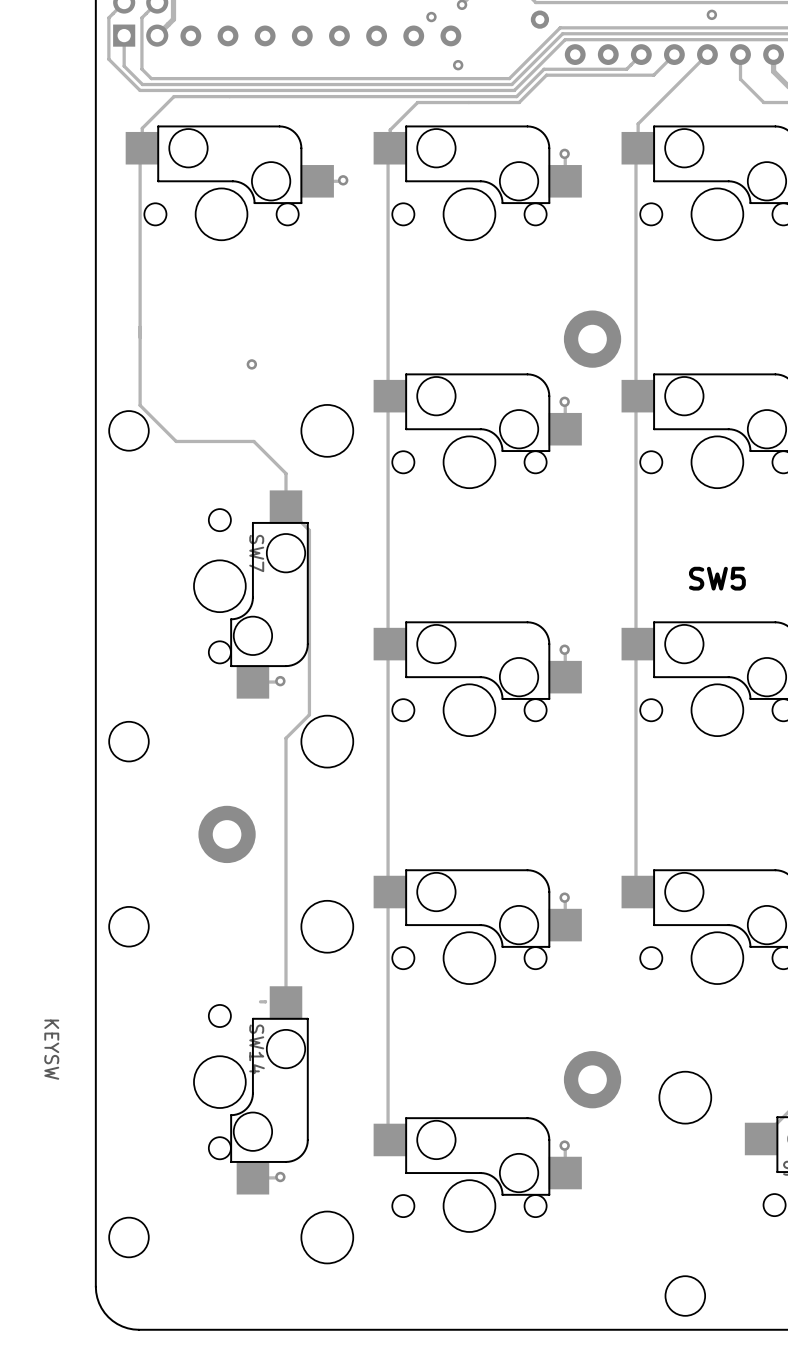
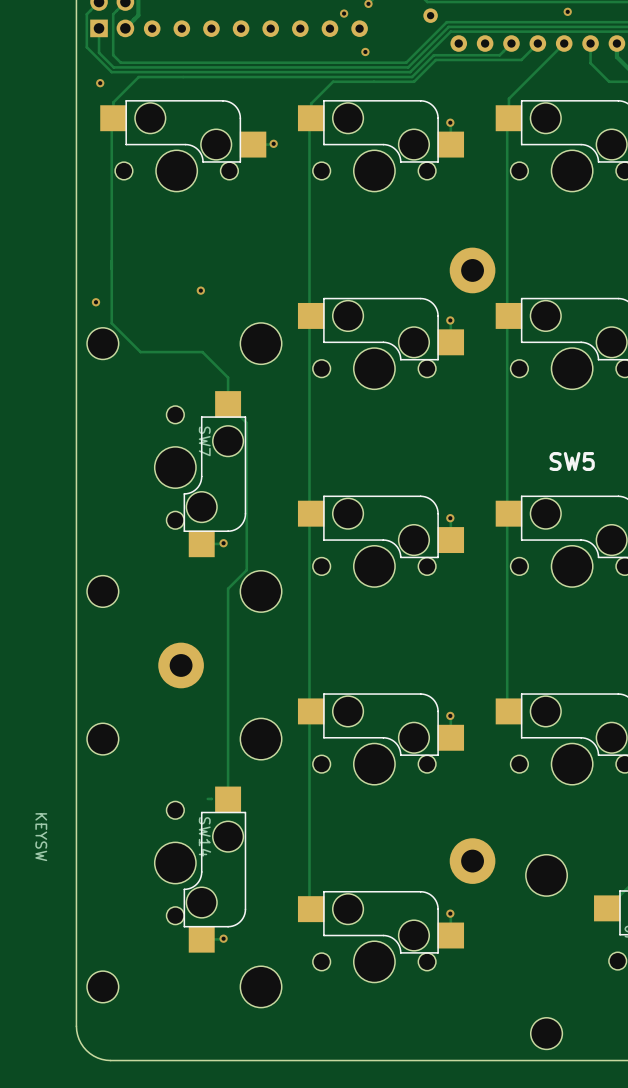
via: none -> (100, 83)
via: none -> (95, 302)

